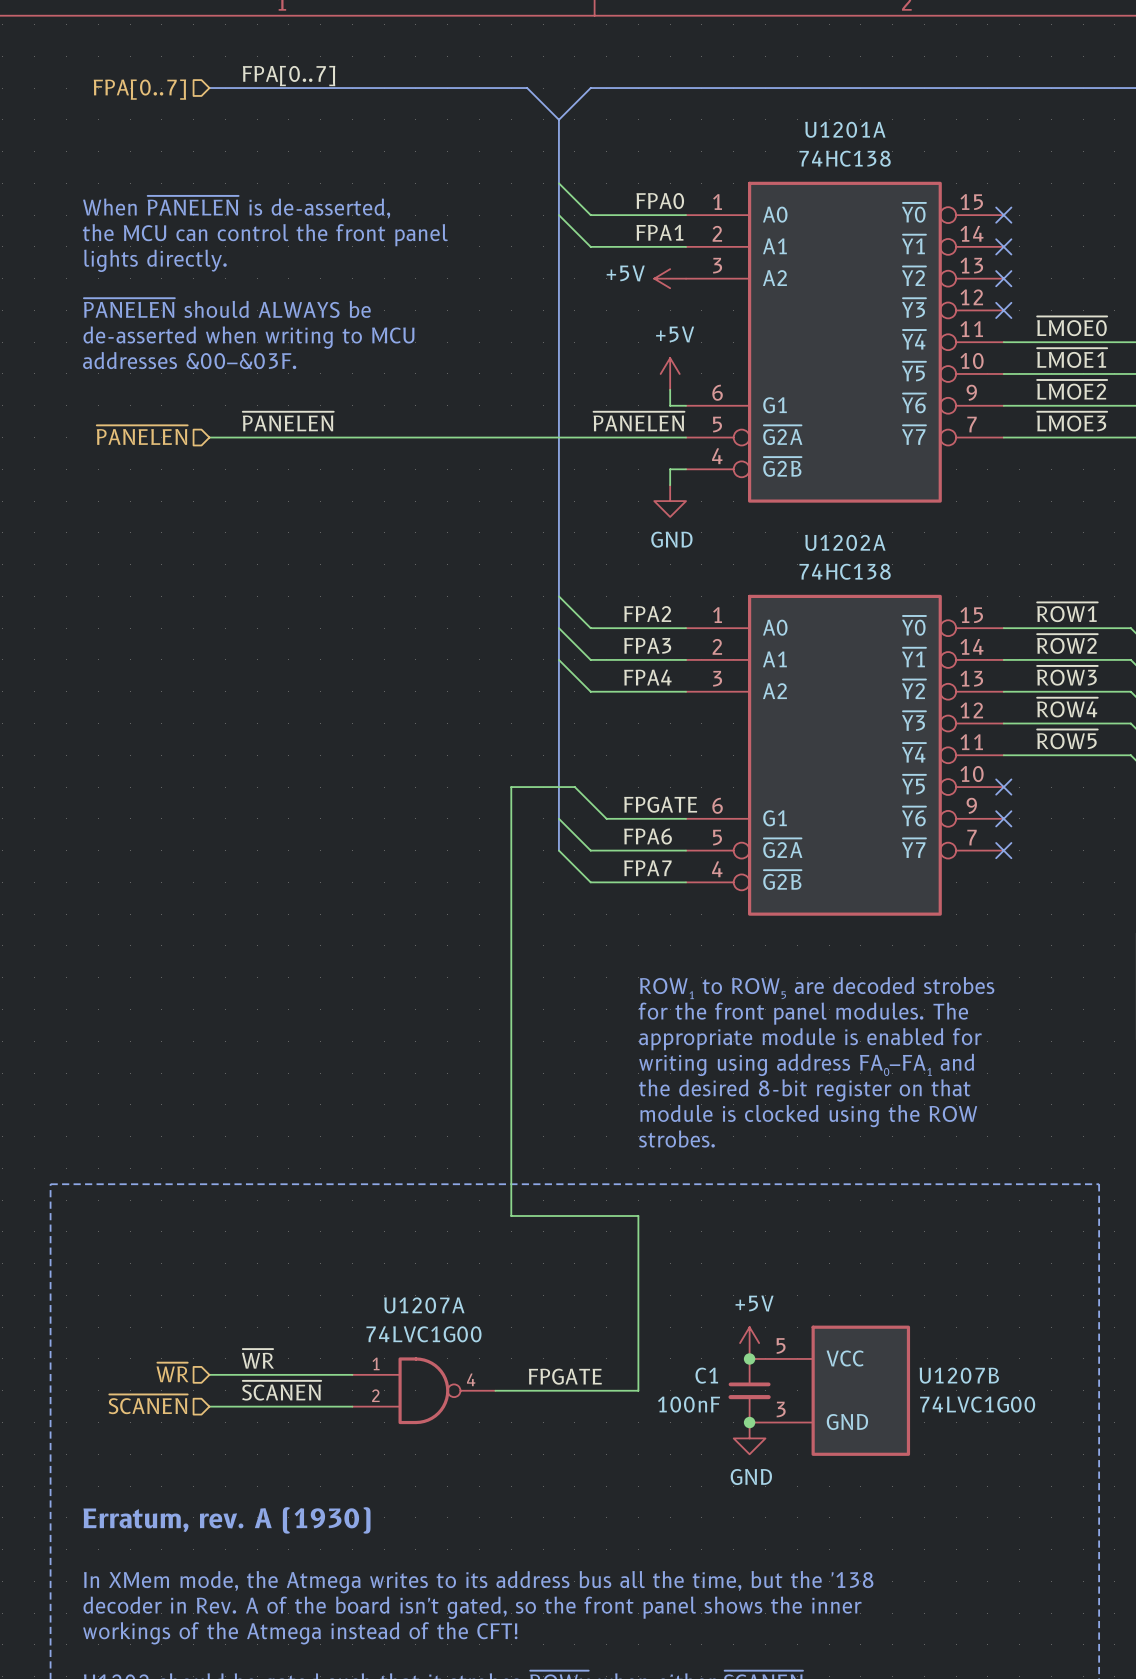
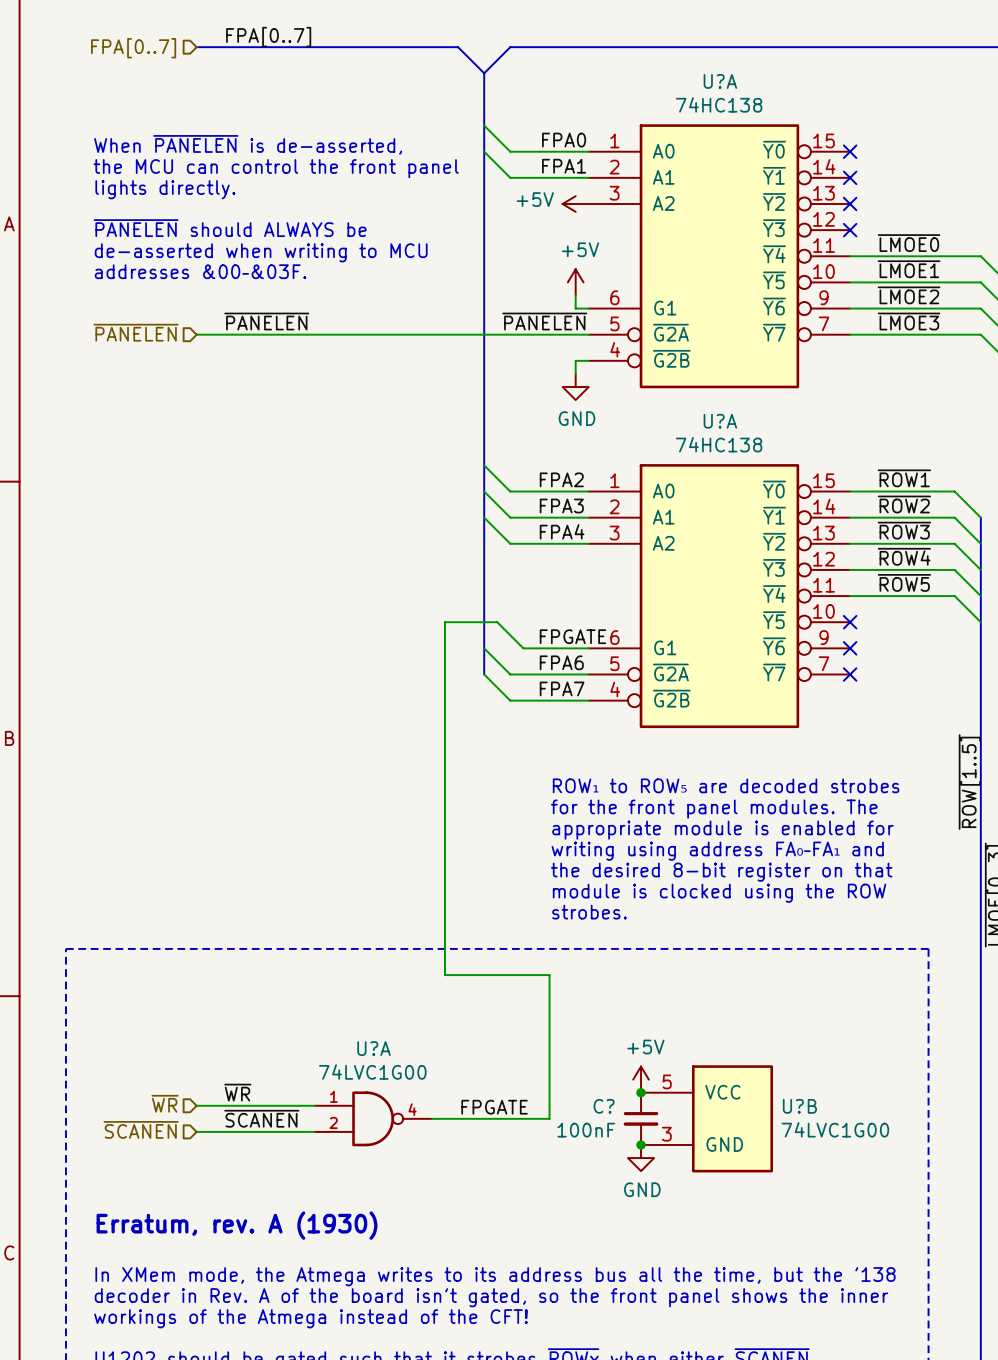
U1201A name: U1201A (845, 129) -> U?A (720, 81)
U1202A name: U1202A (845, 542) -> U?A (720, 421)
U1207A name: U1207A (424, 1305) -> U?A (374, 1048)
C1 name: C1 (706, 1375) -> C? (604, 1106)
U1207B name: U1207B (959, 1375) -> U?B (799, 1106)

